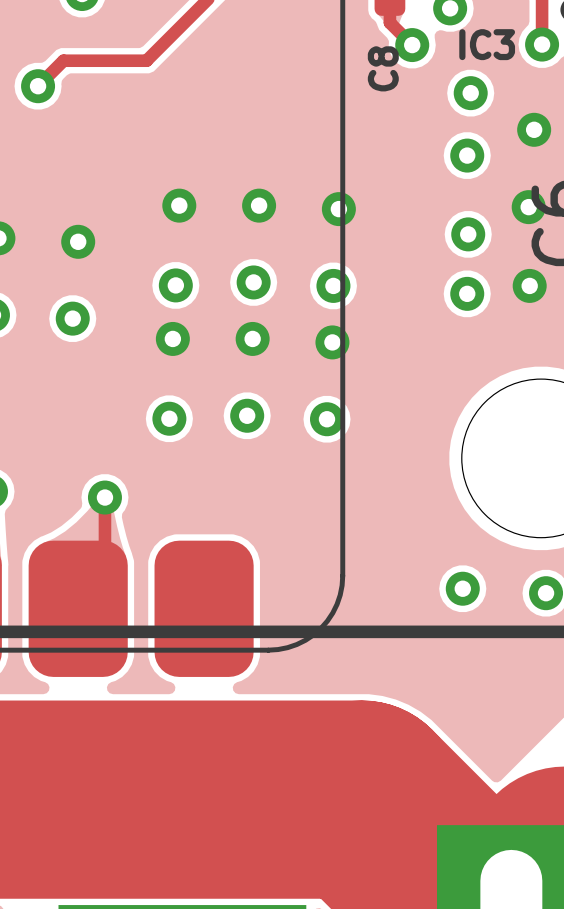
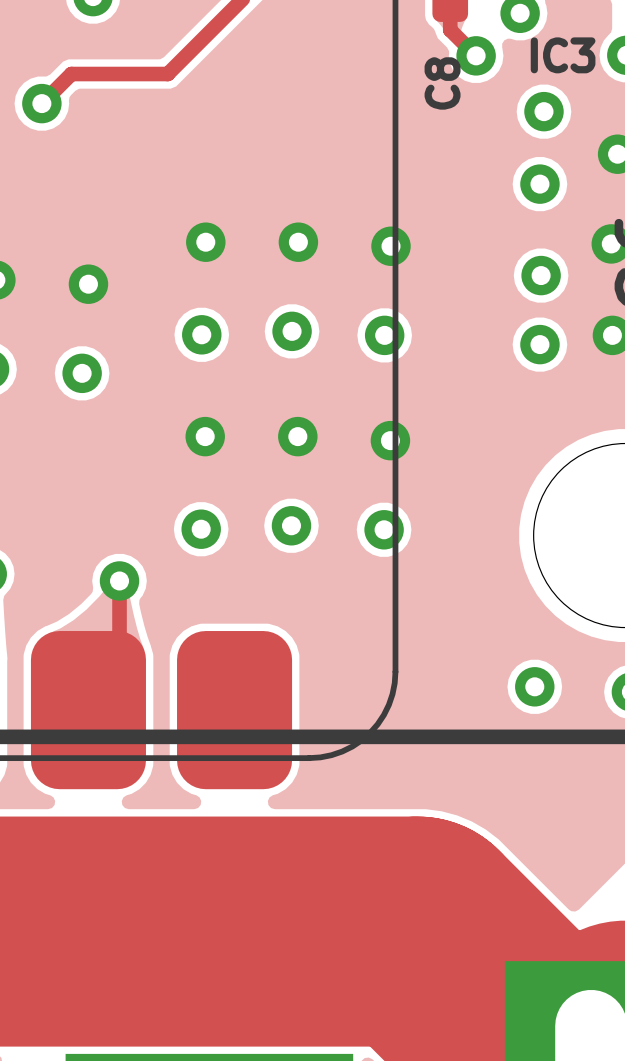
via: (172, 338) -> none
via: (252, 338) -> none
via: (332, 342) -> none
via: none -> (205, 436)
via: none -> (297, 436)
via: none -> (390, 440)
via: (247, 415) -> none
via: (169, 418) -> none
via: (326, 419) -> none
via: none -> (291, 525)
via: none -> (201, 529)
via: none -> (384, 529)

